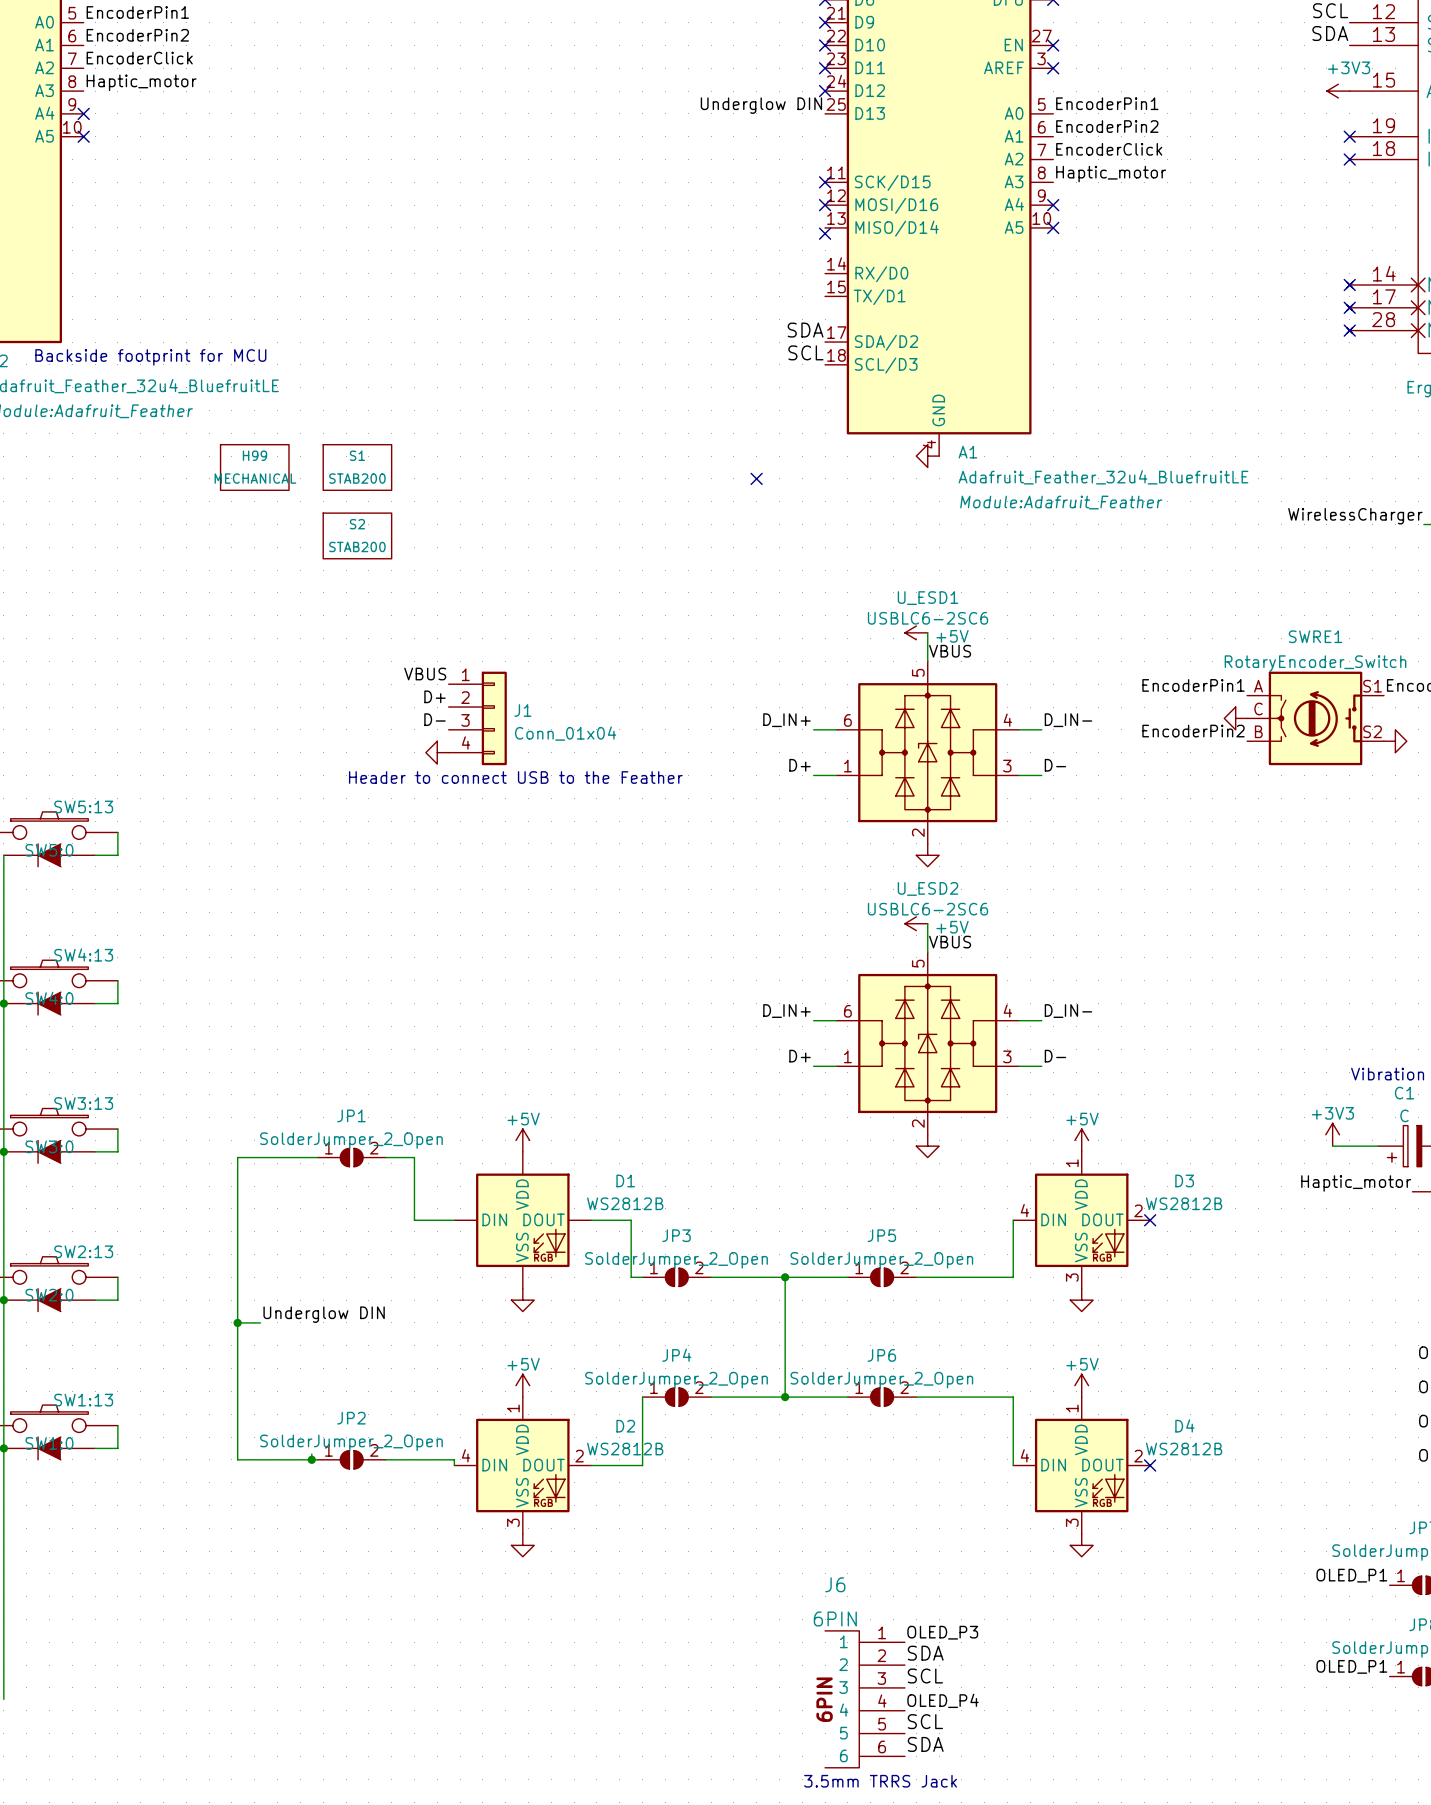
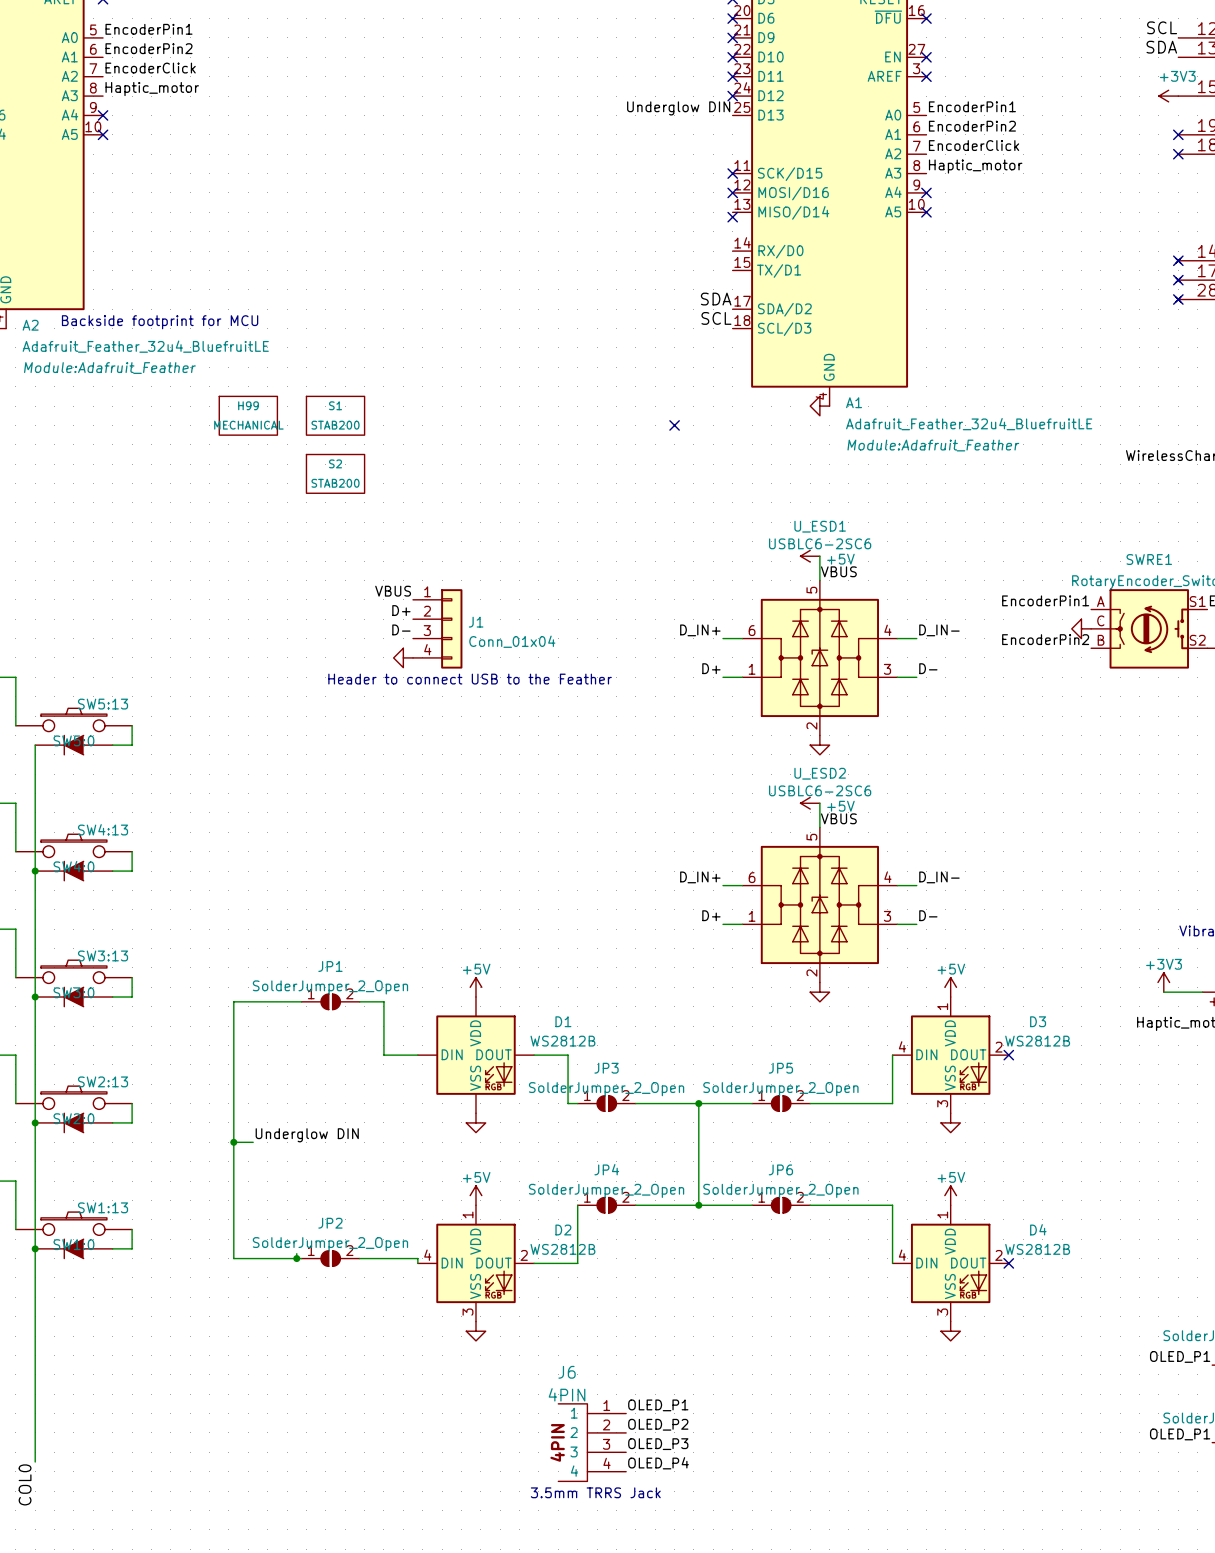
J6 name position: J6 (835, 1584) -> J6 (567, 1372)
J6 value: 6PIN (835, 1618) -> 4PIN (567, 1394)
J6 symbol: [825, 1630, 905, 1768] -> [558, 1403, 627, 1482]
label: none -> OLED_P1 (658, 1405)
label position: OLED_P3 (942, 1632) -> OLED_P3 (658, 1444)
label: SDA (925, 1653) -> none
label: none -> OLED_P2 (658, 1424)
label: SCL (925, 1676) -> none
label position: OLED_P4 (943, 1700) -> OLED_P4 (658, 1463)
label: SCL (925, 1721) -> none
label: SDA (925, 1744) -> none
text position: 3.5mm TRRS Jack (880, 1781) -> 3.5mm TRRS Jack (595, 1492)

